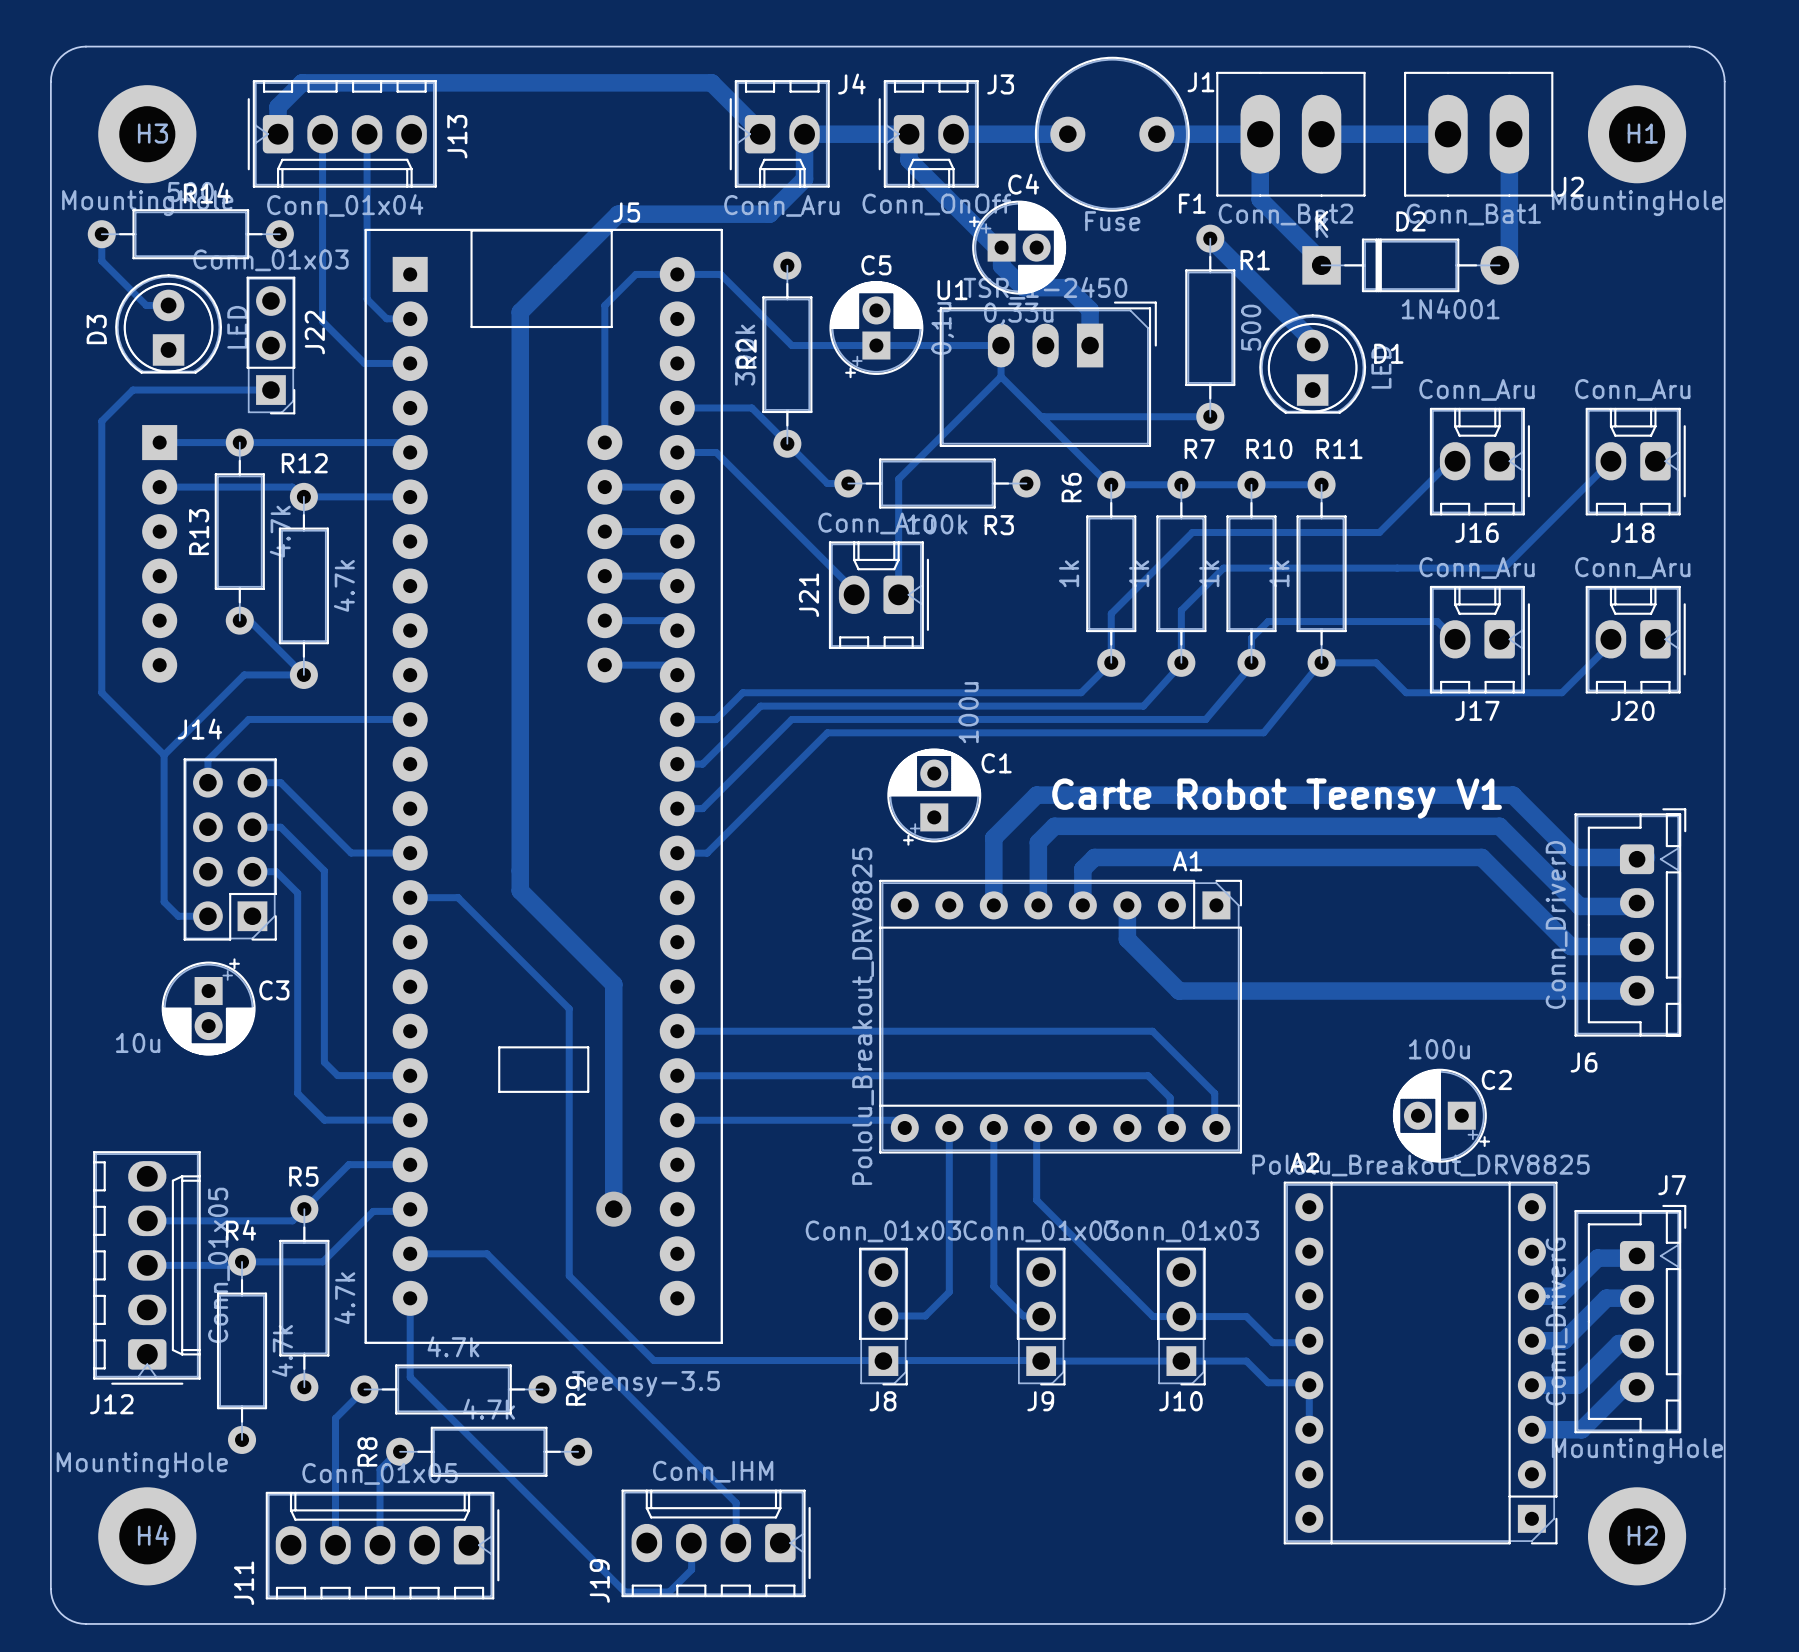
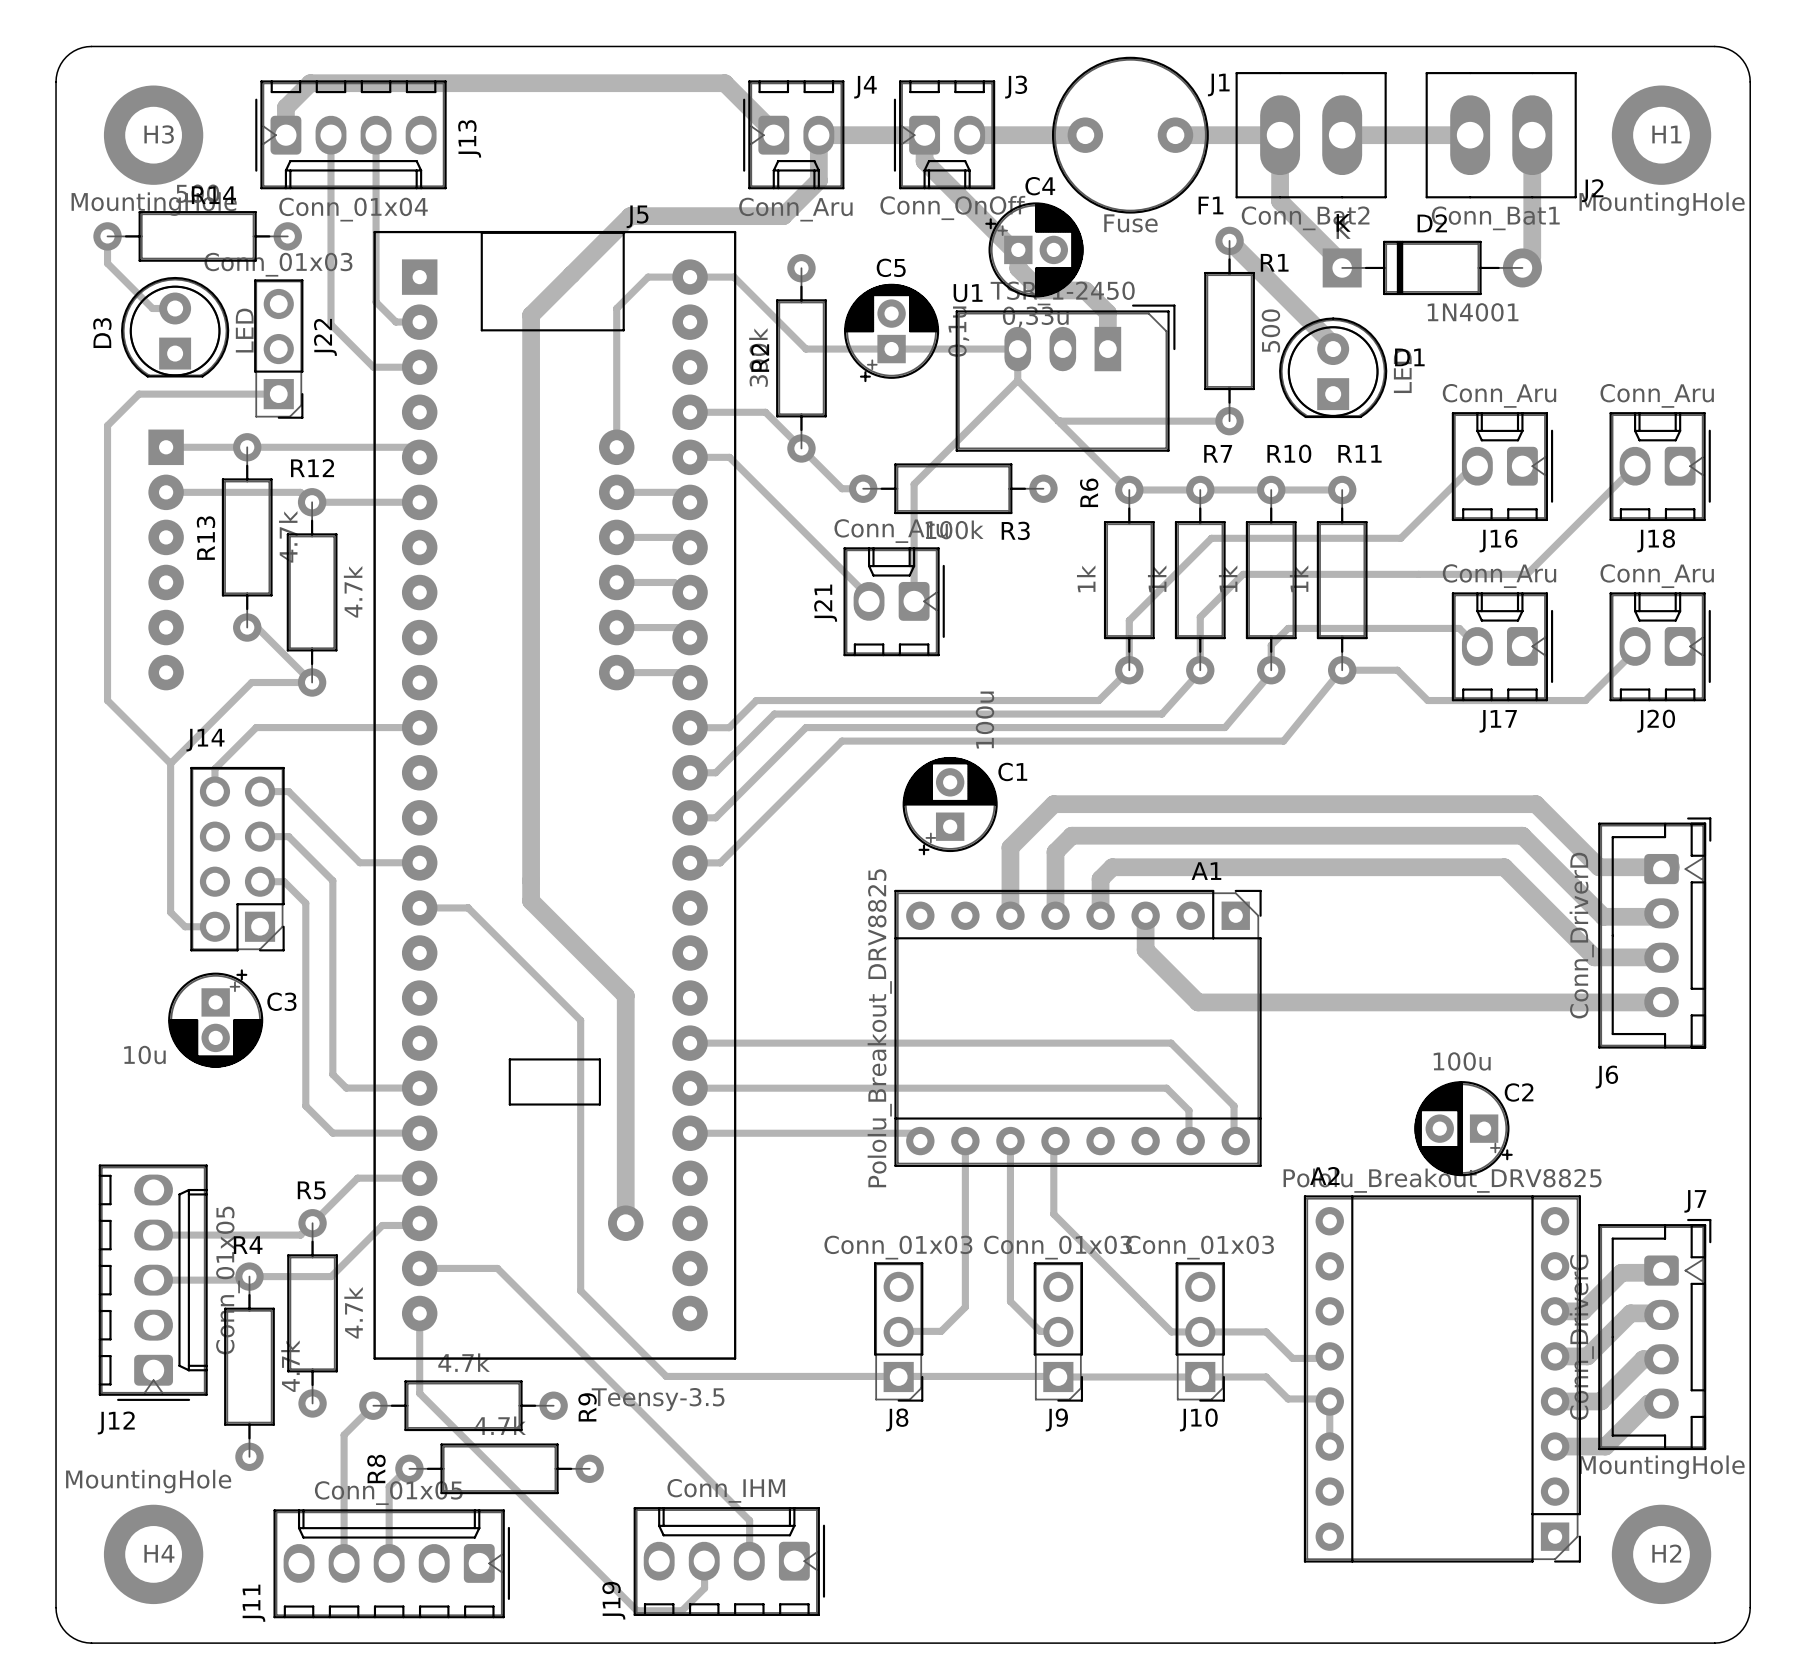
text: Carte Robot Teensy V1 (1277, 798) -> none

